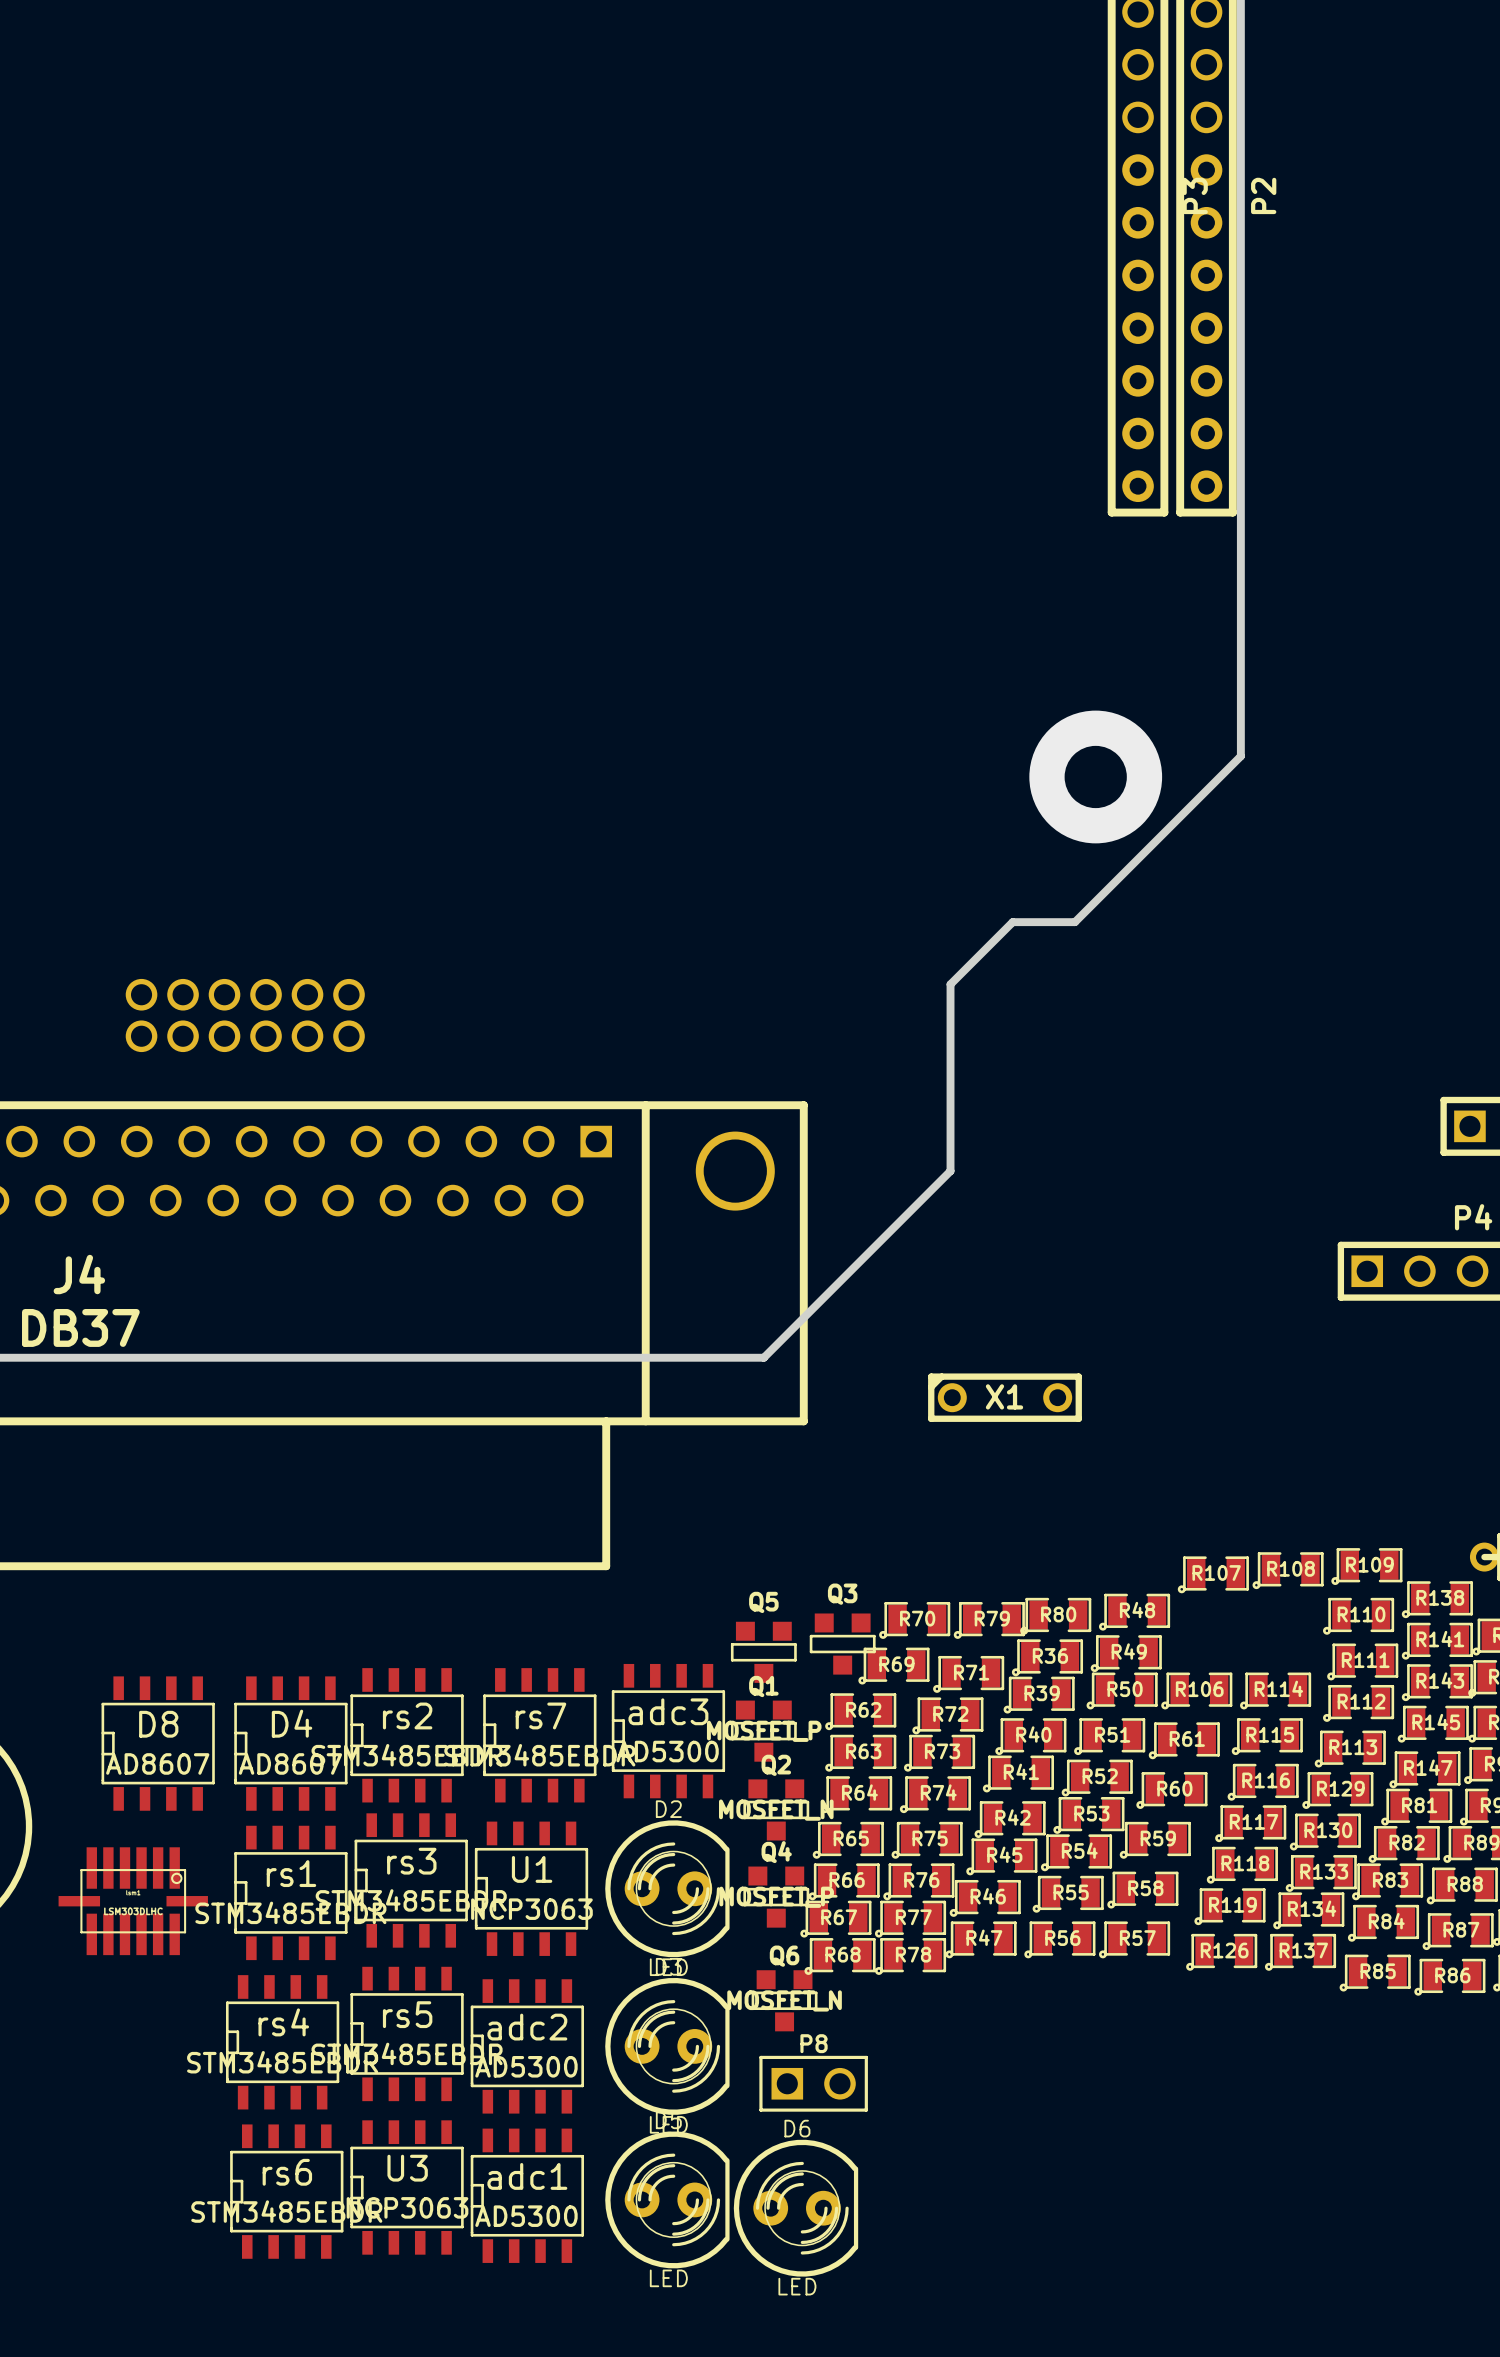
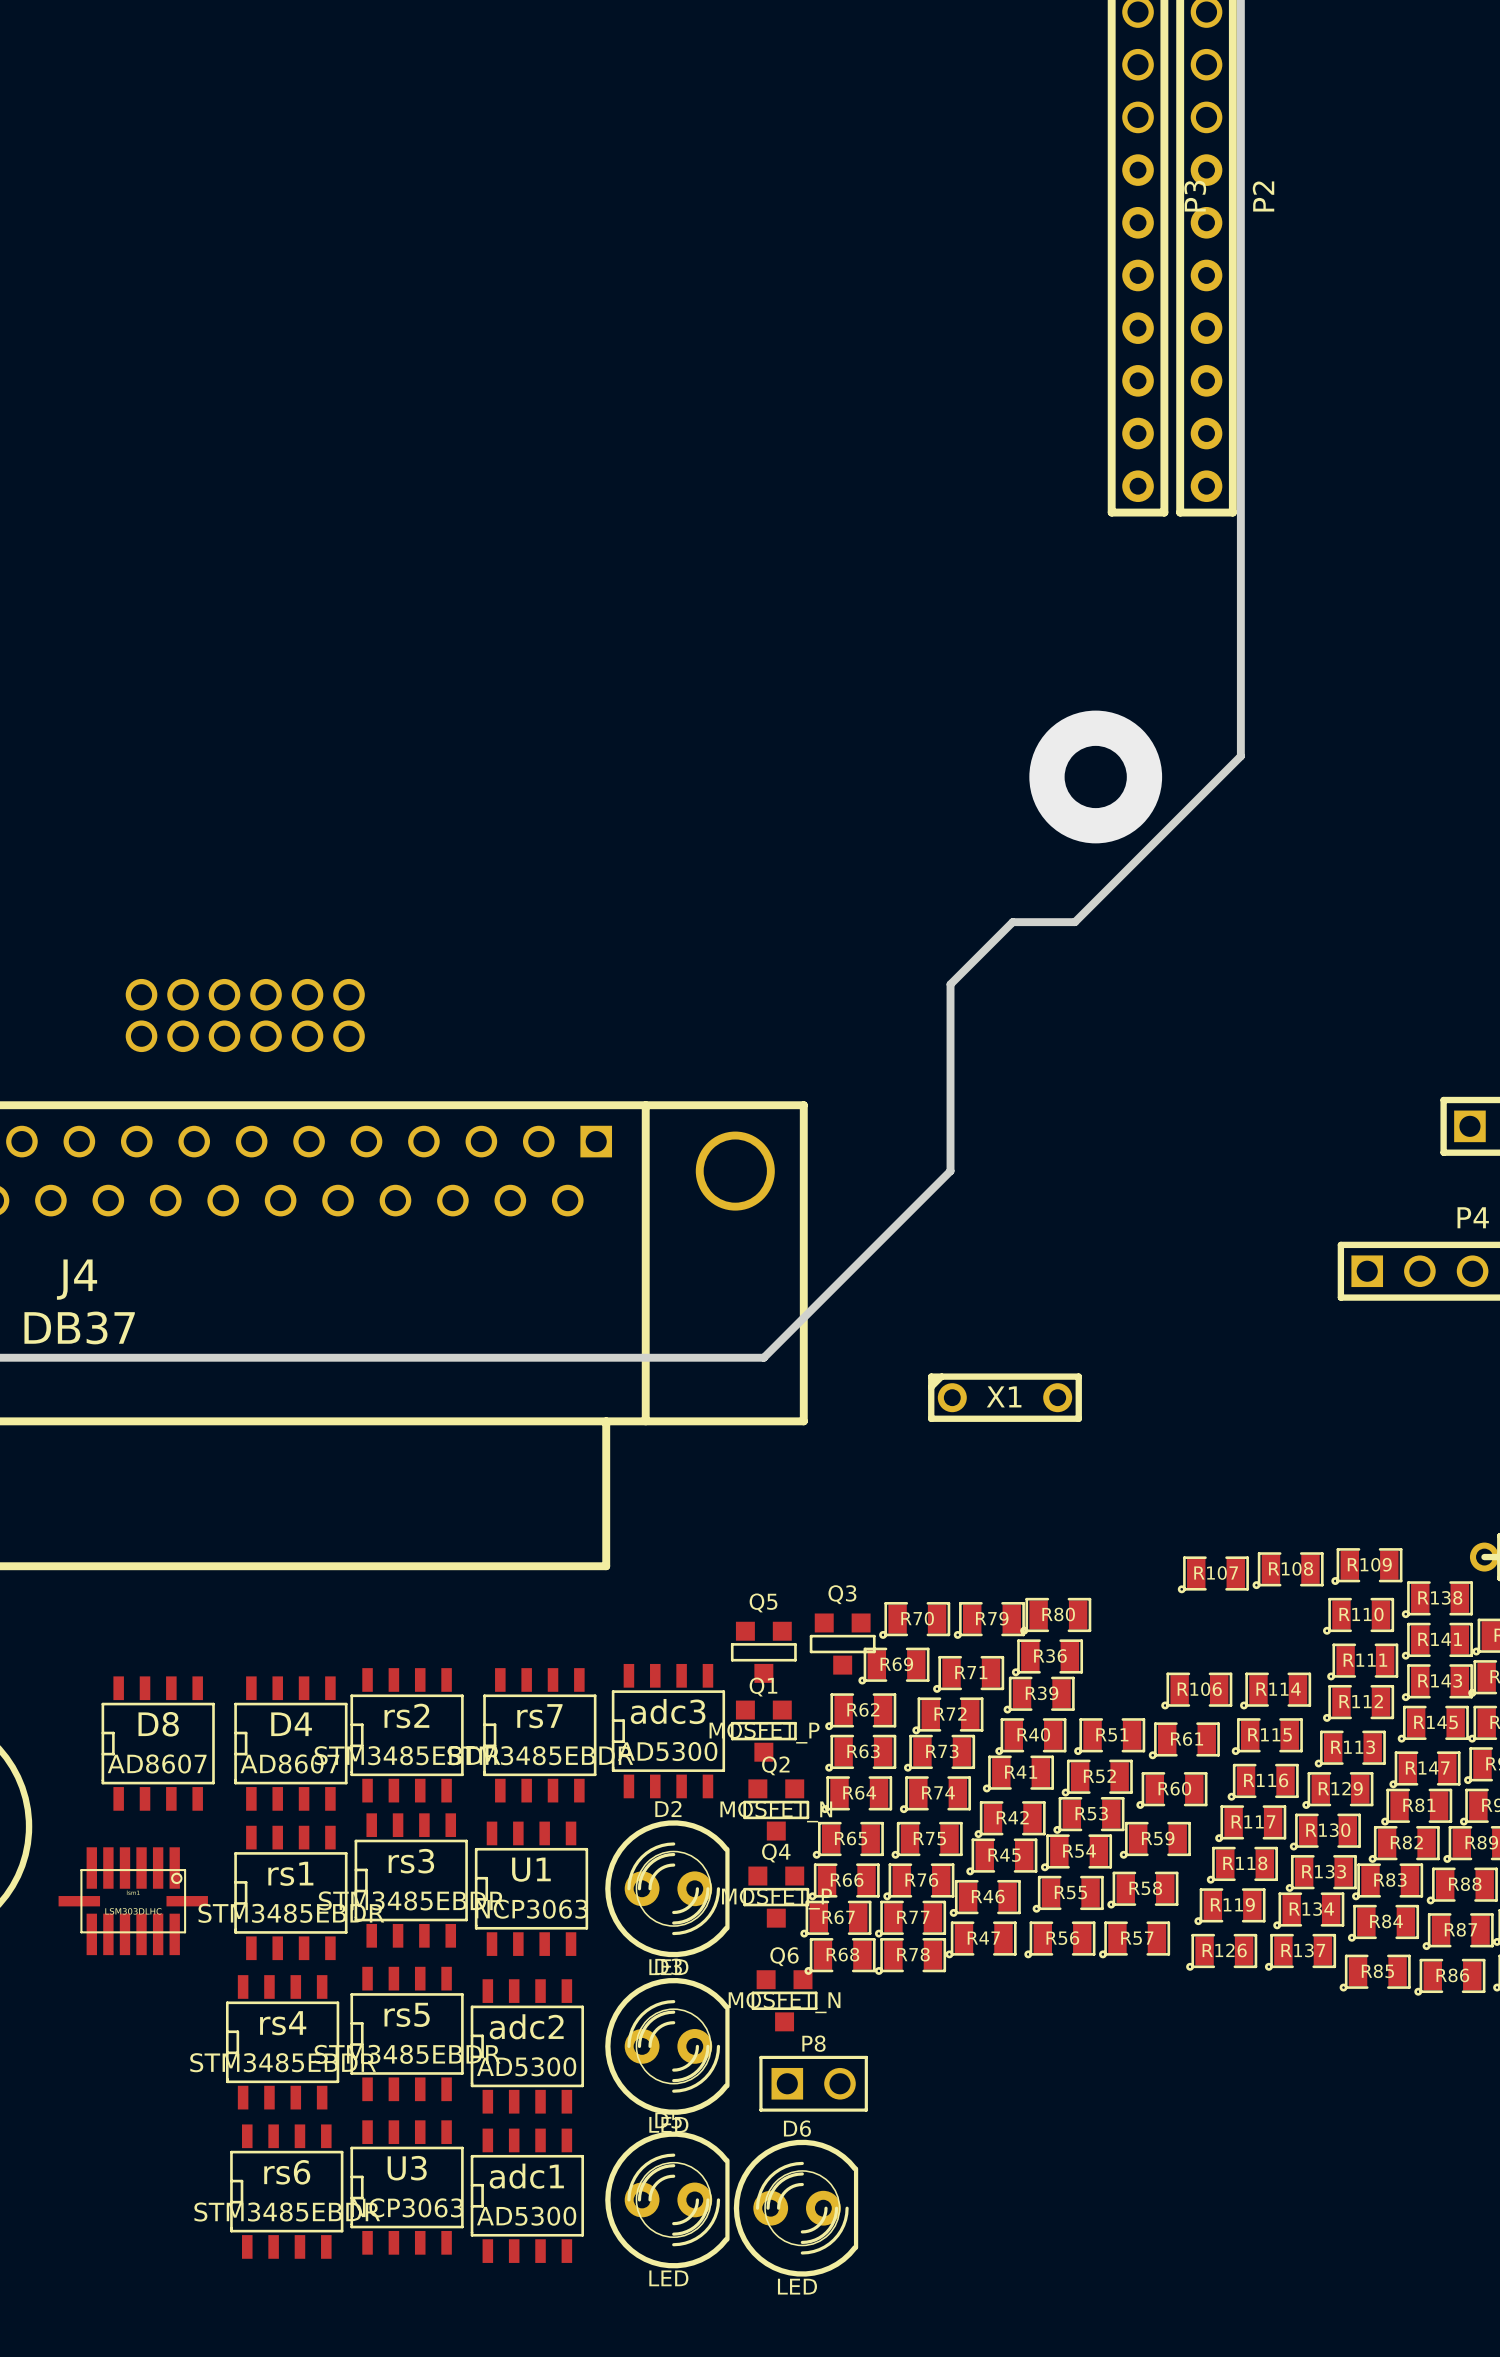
R48: (1134, 1612) -> none
R49: (1126, 1653) -> none
R50: (1122, 1690) -> none

